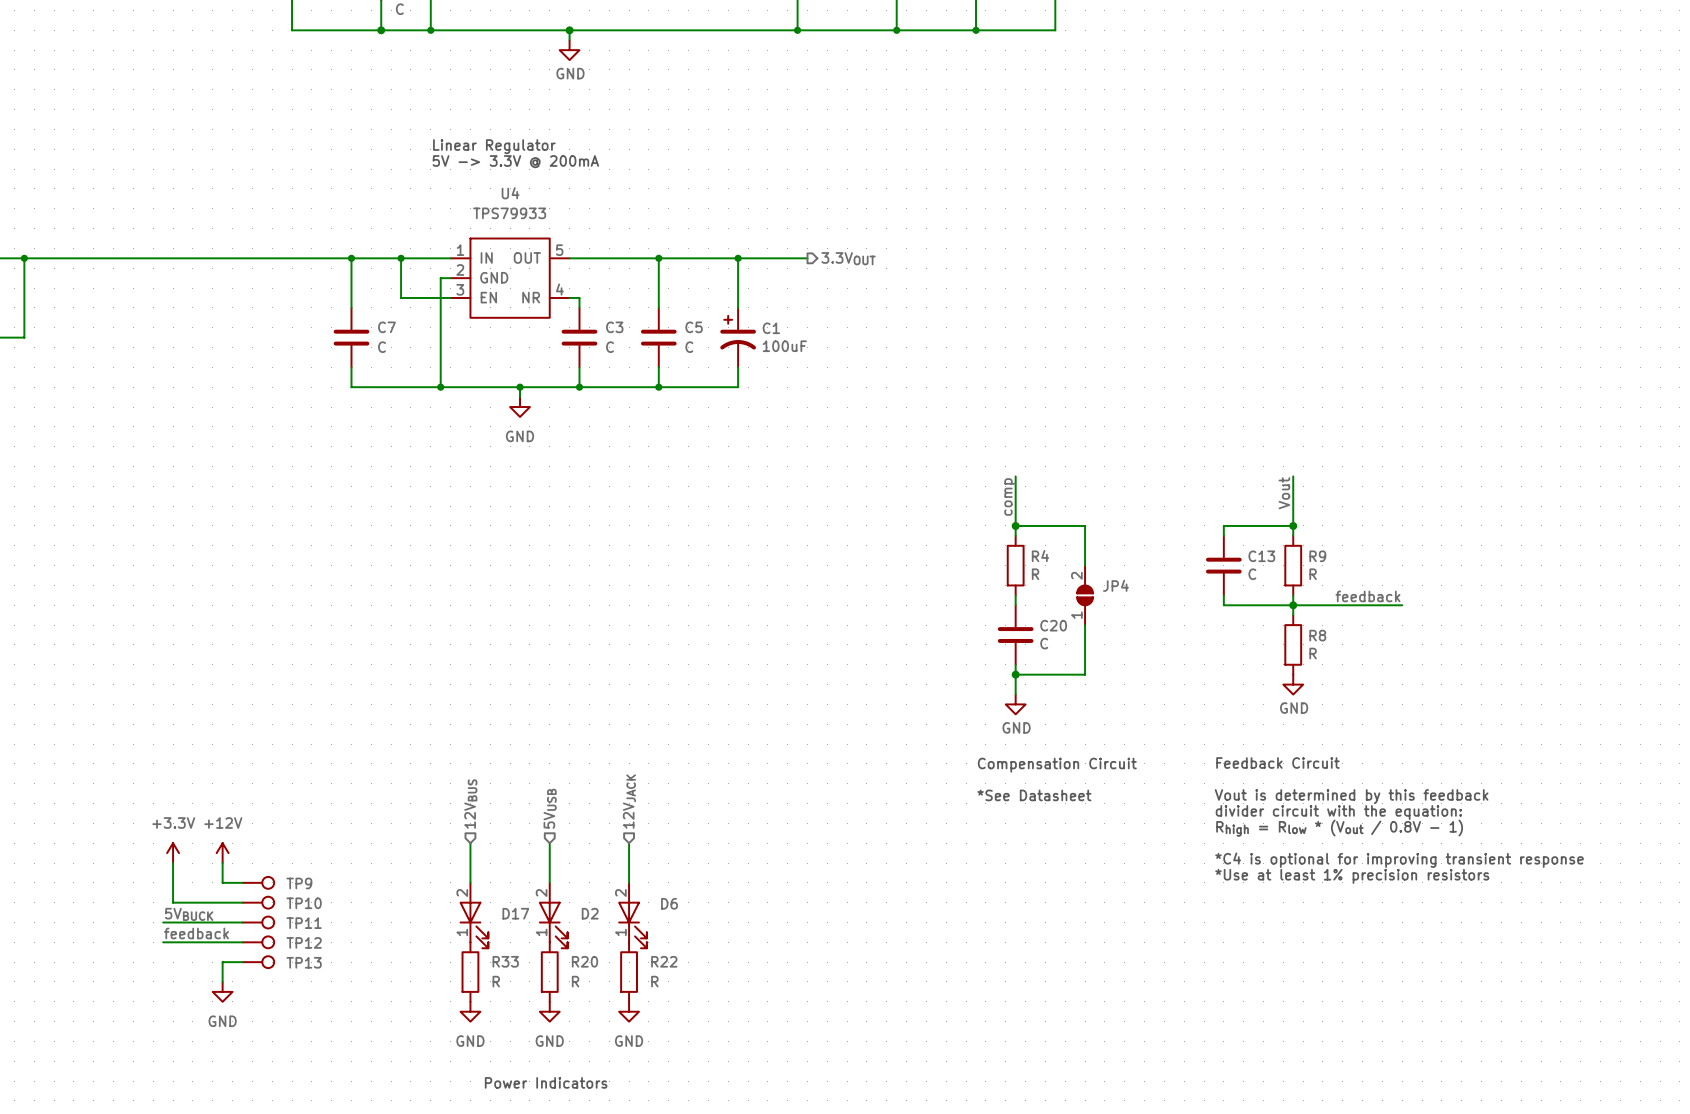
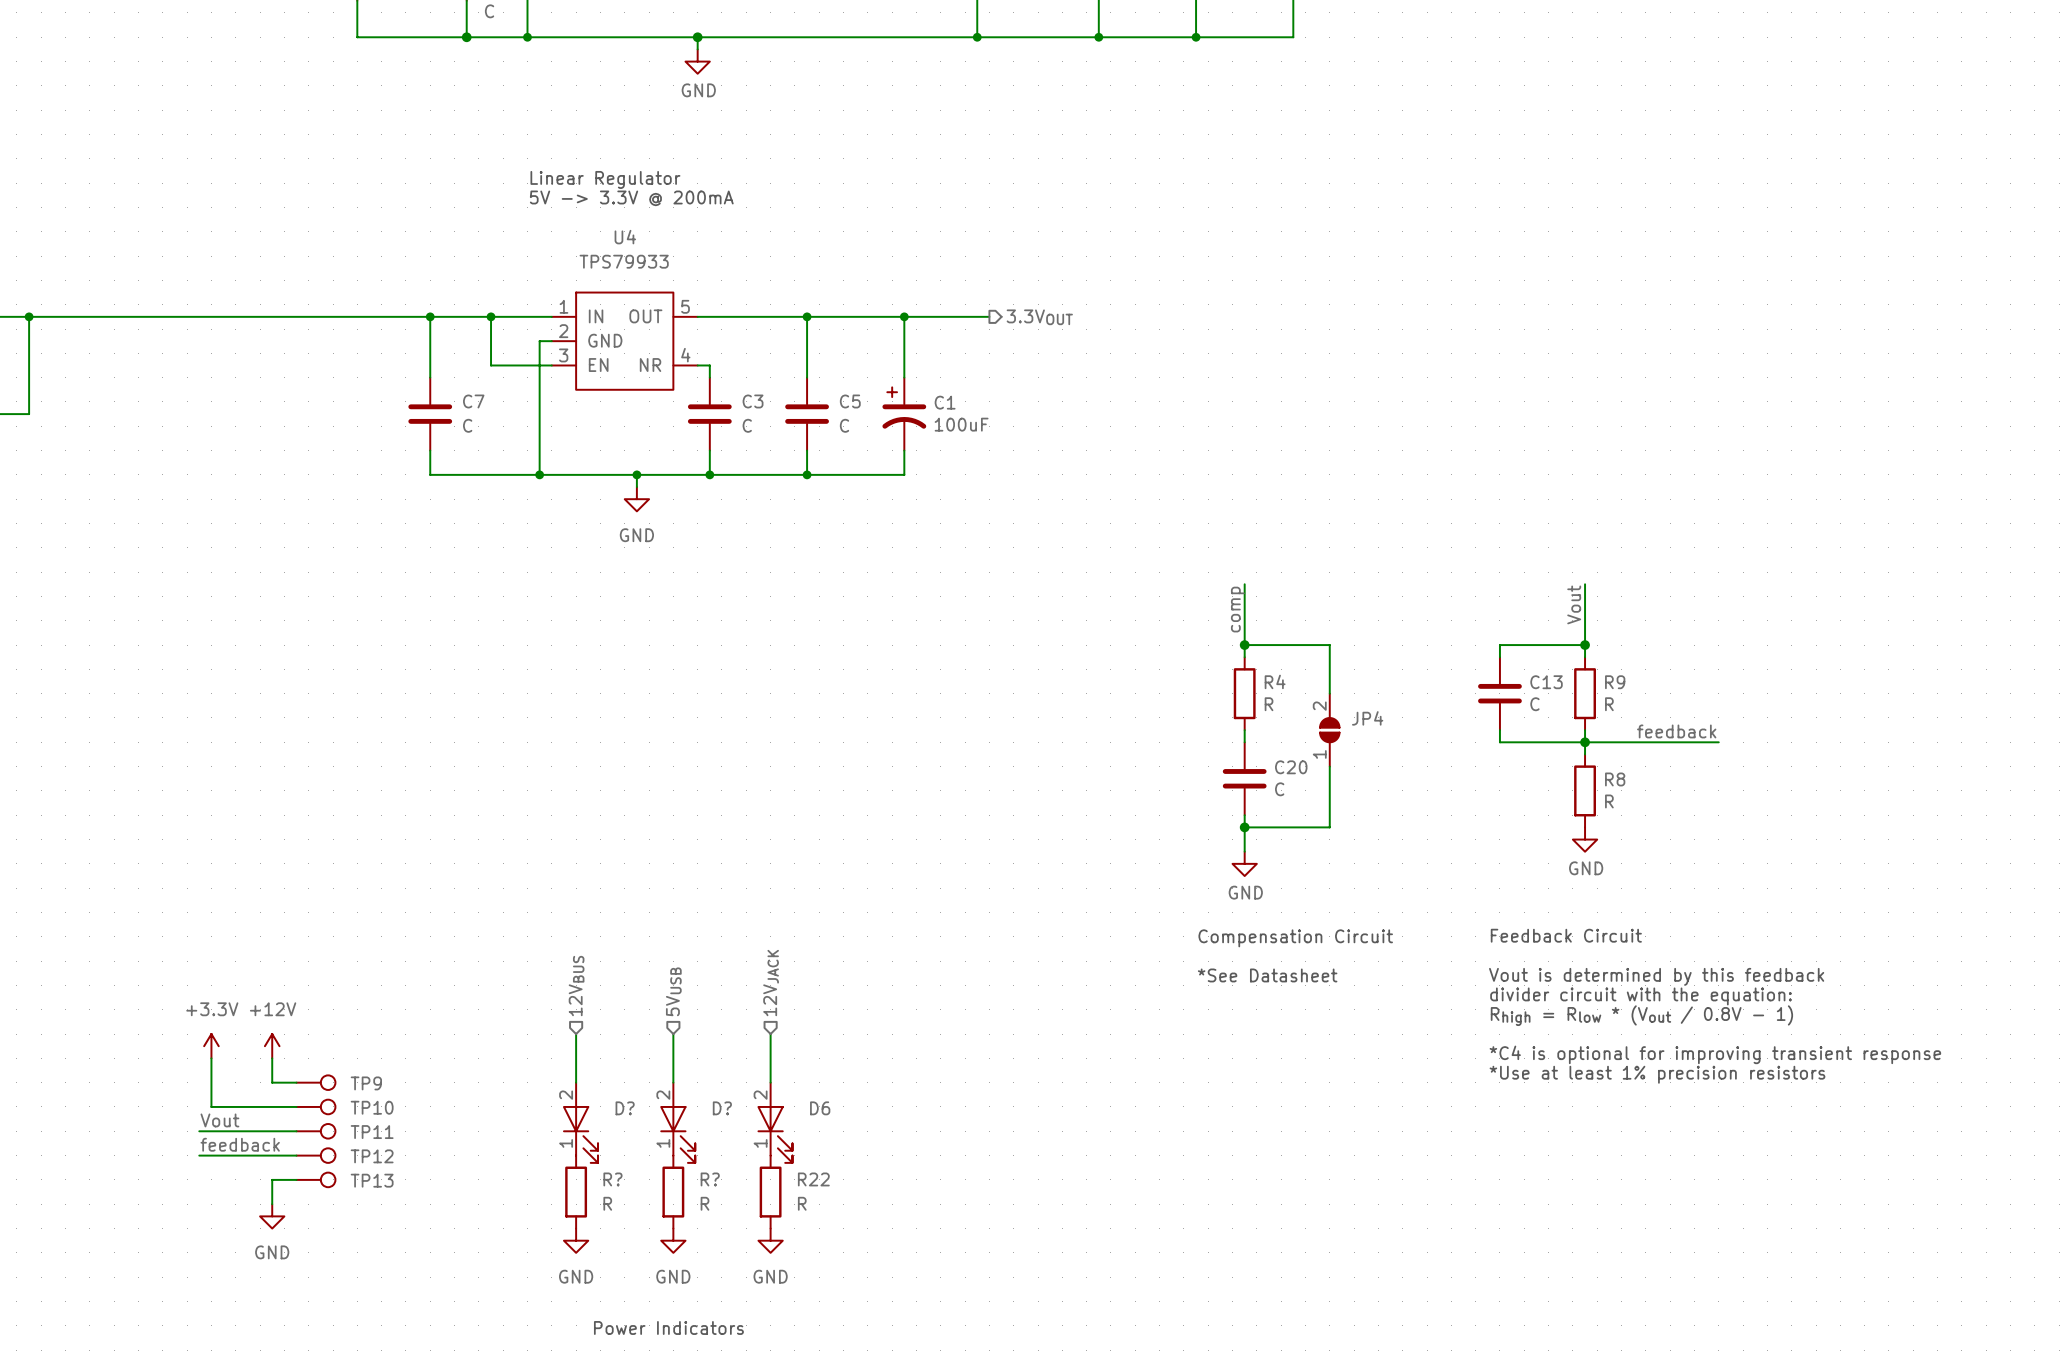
D17 name: D17 (515, 913) -> D? (625, 1108)
D2 name: D2 (590, 913) -> D? (722, 1108)
label: 5VBUCK (189, 914) -> Vout (219, 1120)
R33 name: R33 (505, 961) -> R? (612, 1179)
R20 name: R20 (584, 961) -> R? (710, 1179)

